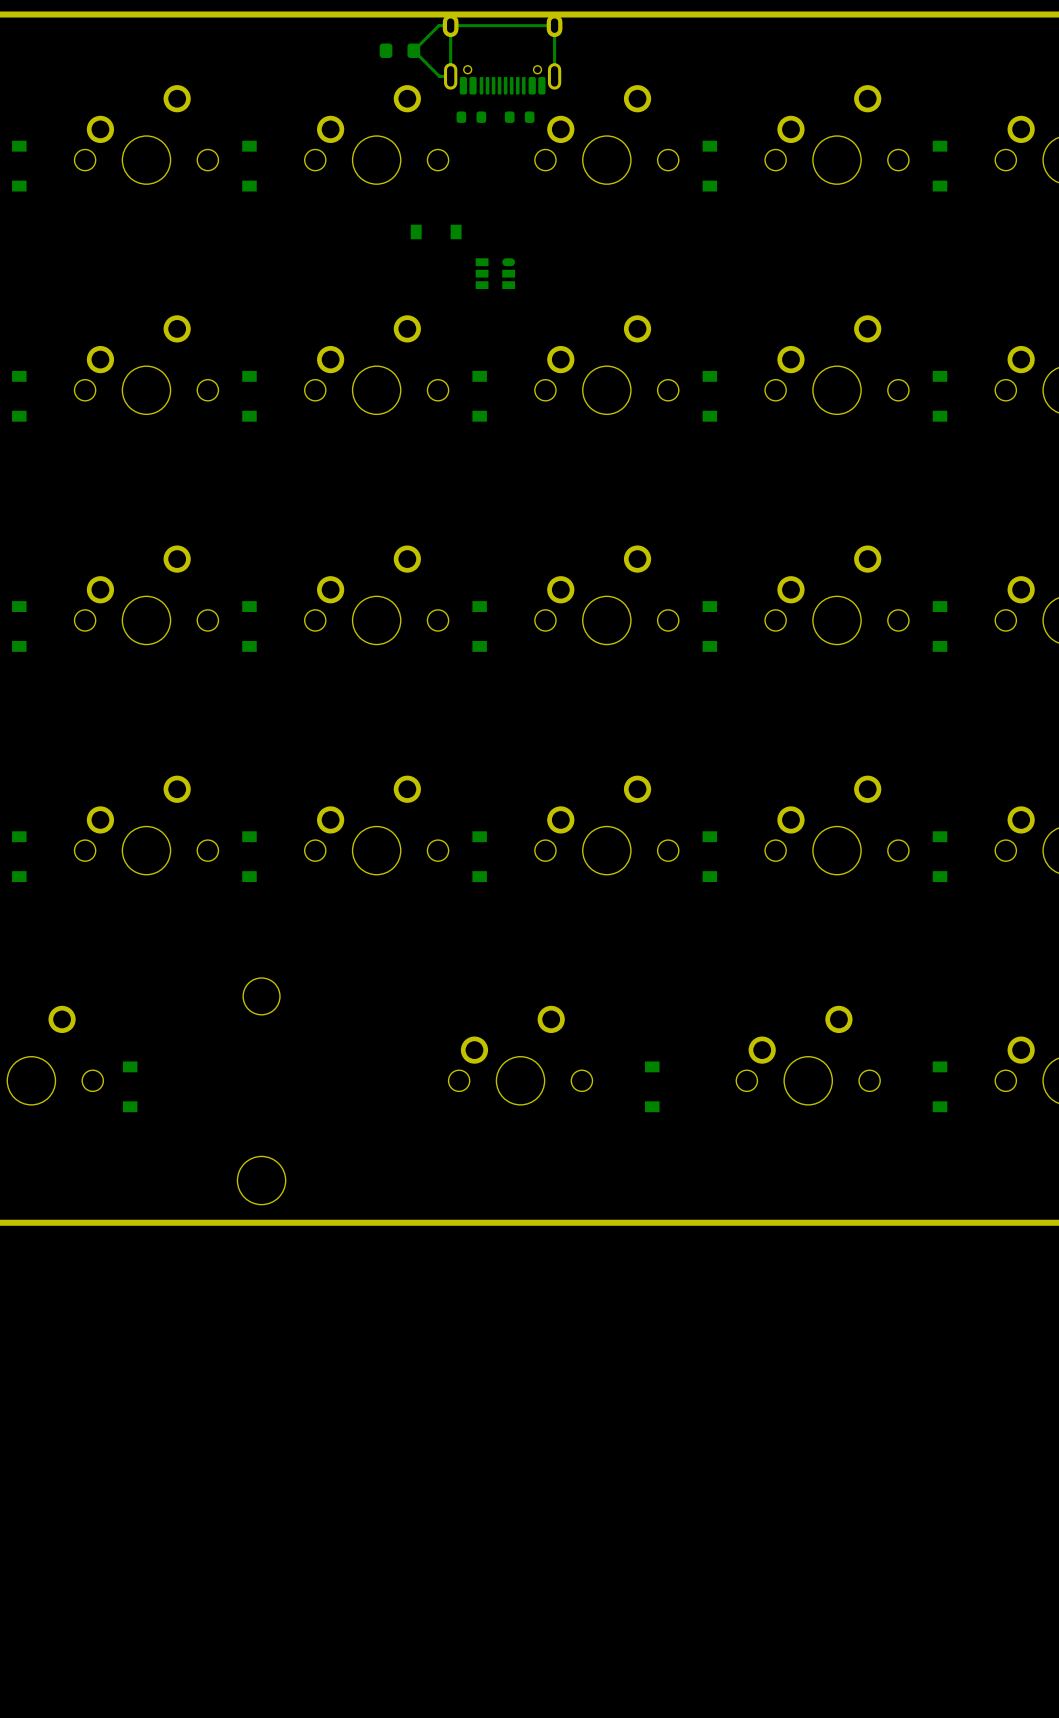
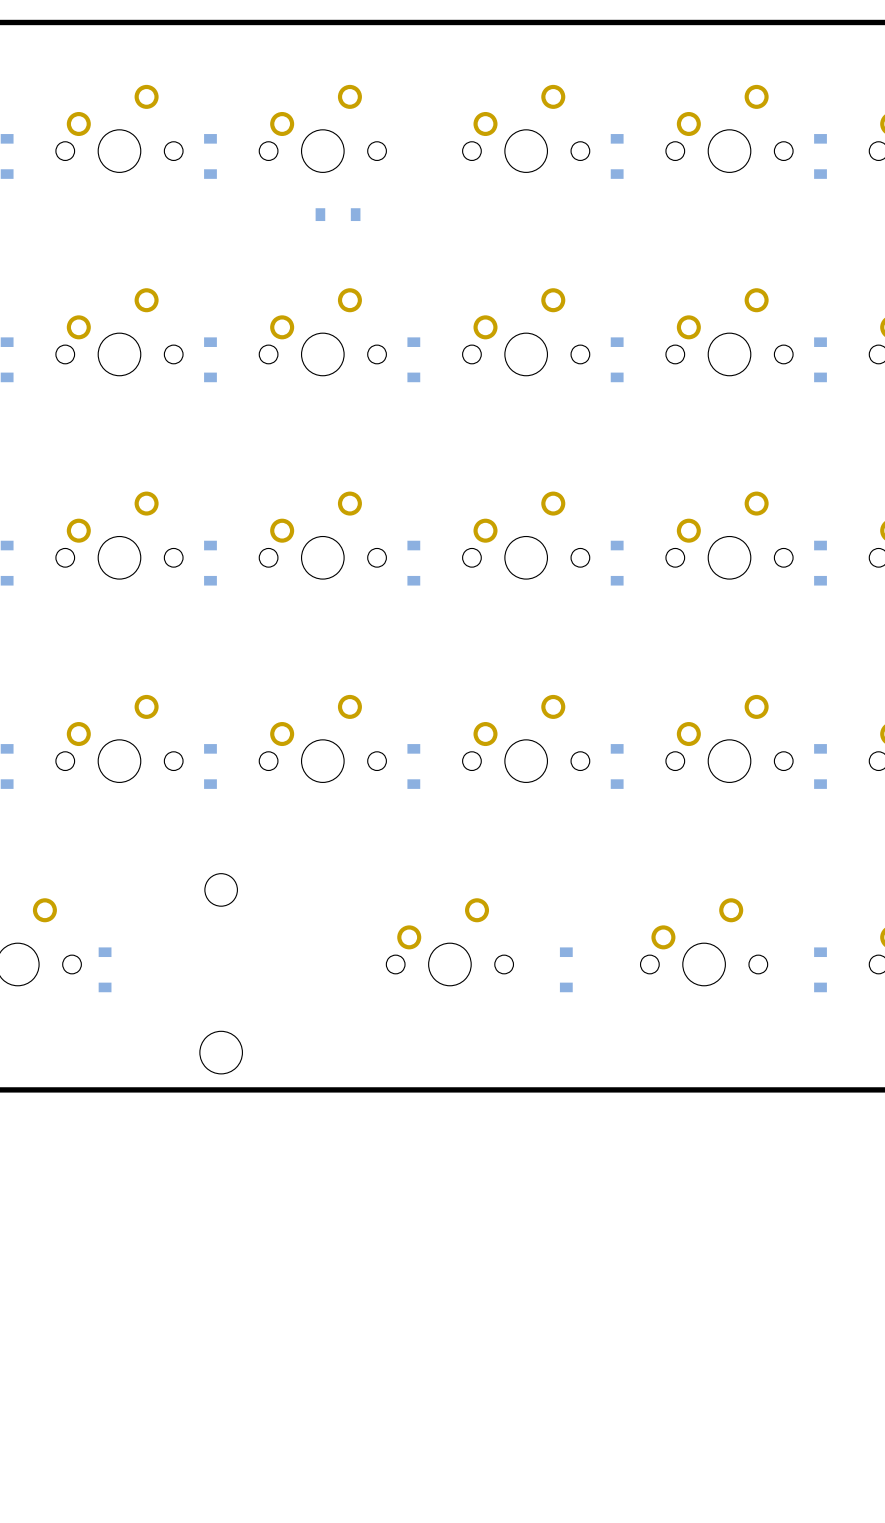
bottom track: (450, 25) (450, 76) (439, 76) (413, 50) (438, 25) (554, 25) (554, 76) -> none
part: (399, 50) -> none
part: (502, 54) -> none
part: (471, 117) -> none
part: (519, 117) -> none
part position: (436, 231) -> (338, 214)
part: (495, 273) -> none

